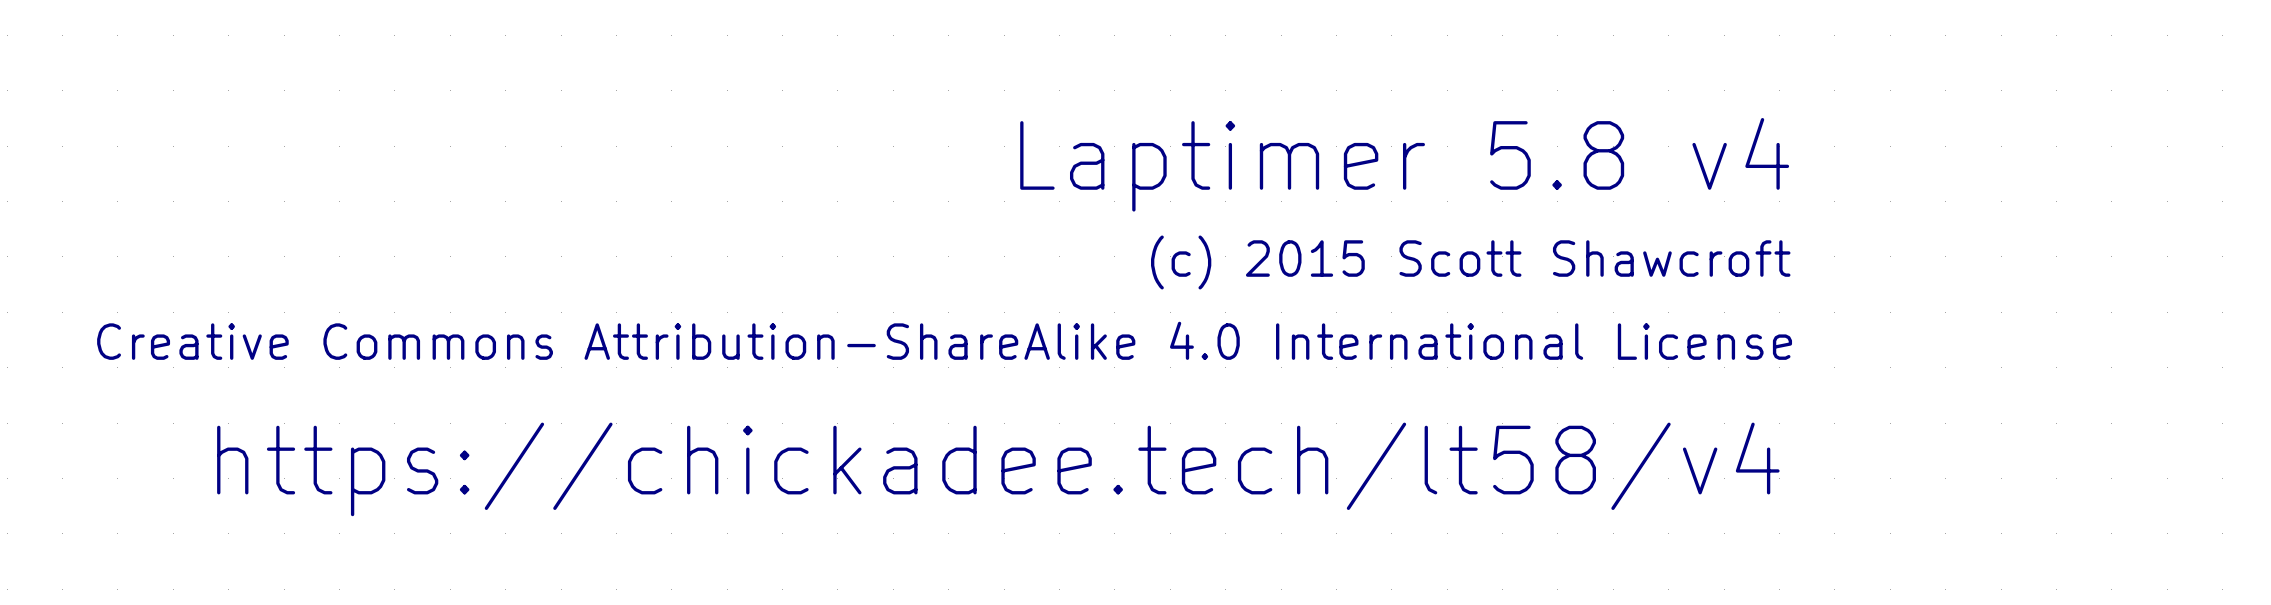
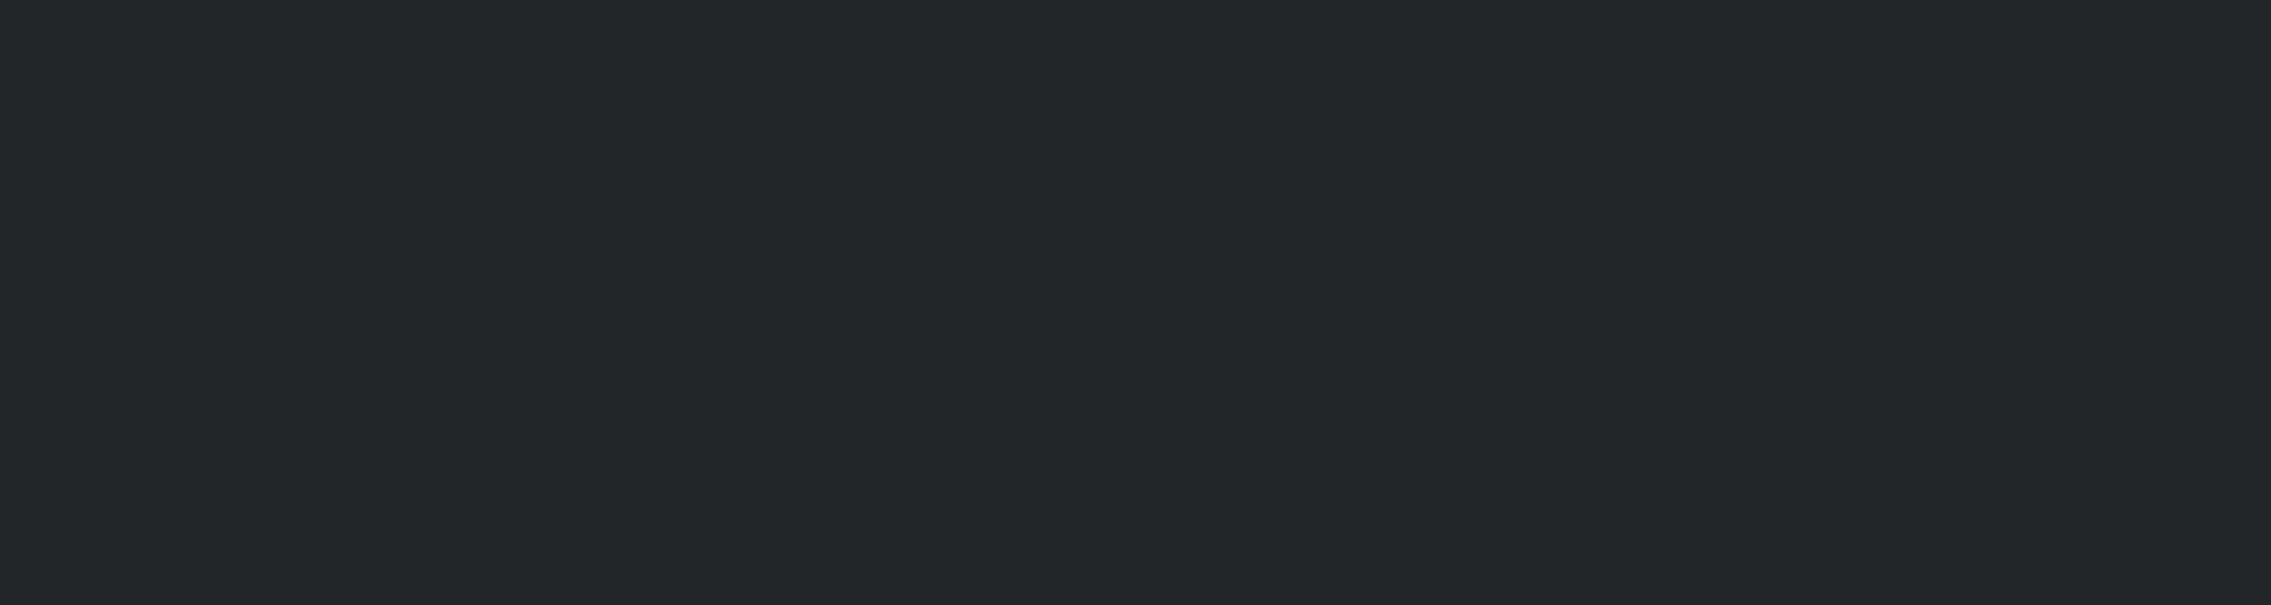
text: Laptimer 5.8 v4 (1404, 164) -> none
text: (c) 2015 Scott Shawcroft (1470, 262) -> none
text: Creative Commons Attribution-ShareAlike 4.0 International License (944, 340) -> none
text: https://chickadee.tech/lt58/v4 (998, 469) -> none

